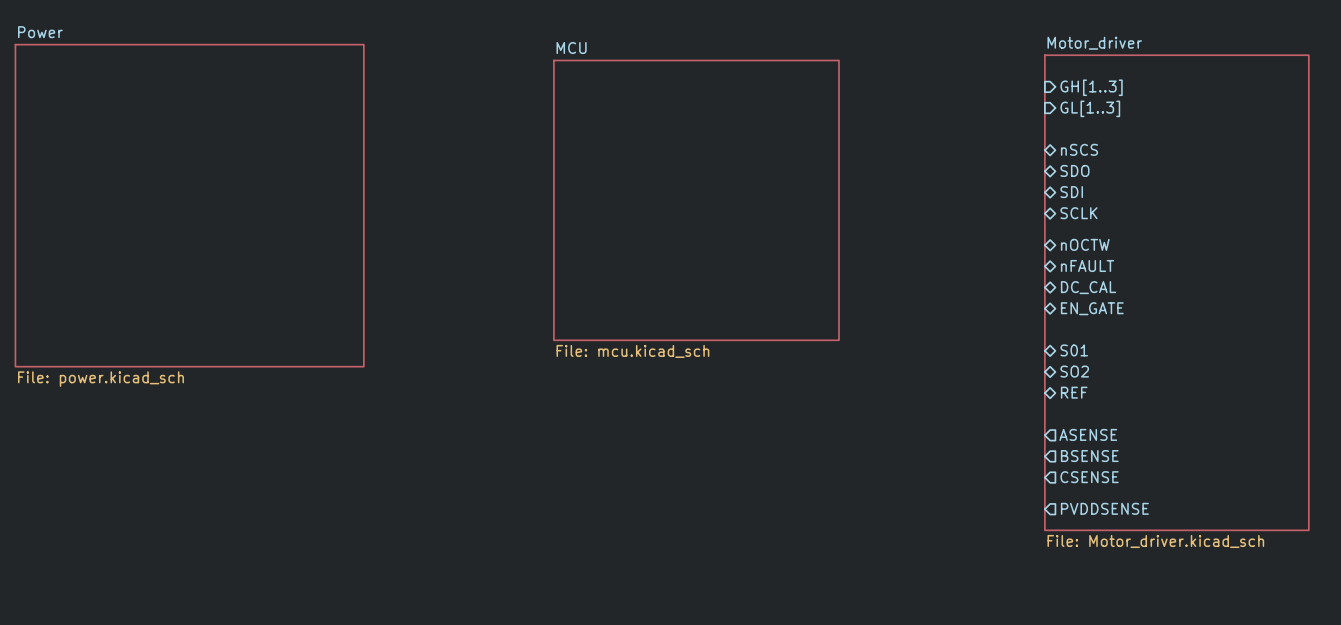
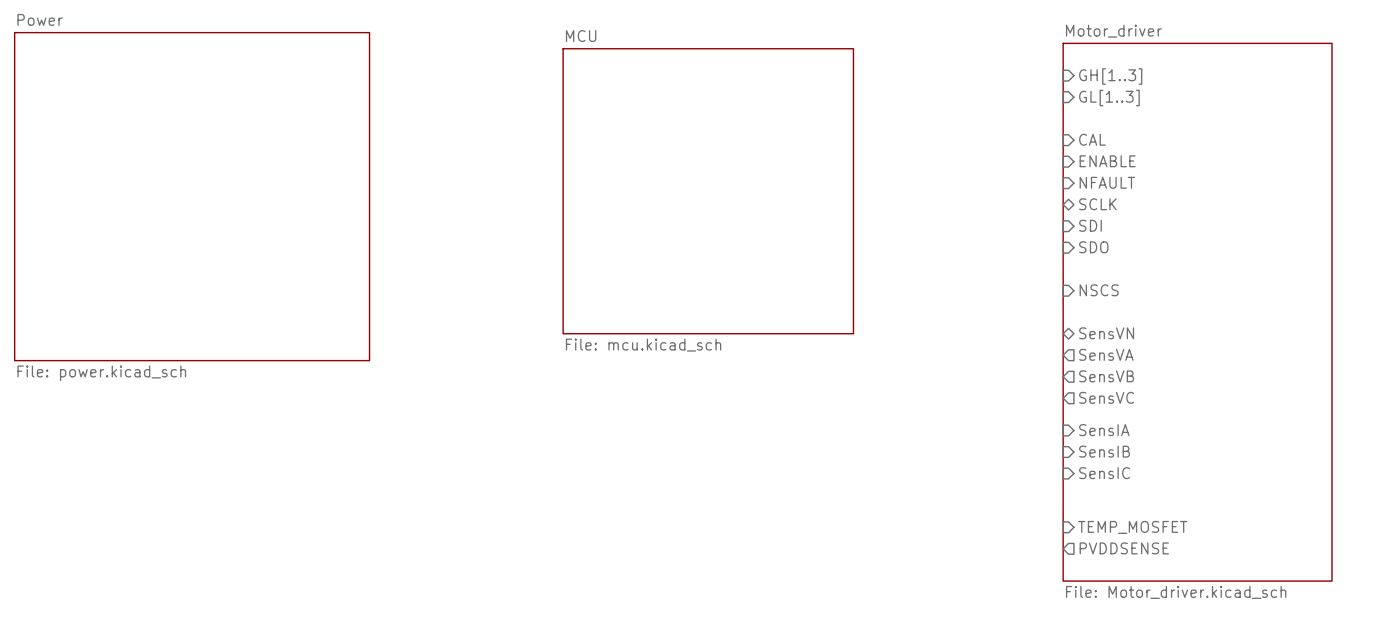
sheet pin shape: bidirectional (1079, 149) -> input (1092, 139)
sheet pin: nSCS (1079, 149) -> CAL (1092, 139)
sheet pin shape: bidirectional (1074, 170) -> input (1107, 161)
sheet pin: SDO (1074, 170) -> ENABLE (1107, 161)
sheet pin shape: bidirectional (1071, 192) -> input (1107, 182)
sheet pin: SDI (1071, 192) -> NFAULT (1107, 182)
sheet pin: none -> SDI (1090, 225)
sheet pin: nOCTW (1085, 244) -> none
sheet pin: none -> SDO (1093, 247)
sheet pin: nFAULT (1087, 265) -> none
sheet pin: DC_CAL (1088, 287) -> none
sheet Motor_driver: File: Motor_driver.kicad_sch (1176, 292) -> none
sheet pin: none -> NSCS (1099, 290)
sheet pin: EN_GATE (1092, 308) -> none
sheet Motor_driver: none -> File: Motor_driver.kicad_sch (1197, 312)
sheet pin: none -> SensVN (1106, 333)
sheet pin: S01 (1074, 350) -> none
sheet pin: none -> SensVA (1106, 354)
sheet pin: SO2 (1074, 371) -> none
sheet pin: none -> SensVB (1106, 376)
sheet pin: REF (1074, 392) -> none
sheet pin: none -> SensVC (1106, 397)
sheet pin shape: output (1088, 434) -> input (1104, 430)
sheet pin: ASENSE (1088, 434) -> SensIA (1104, 430)
sheet pin shape: output (1089, 456) -> input (1104, 451)
sheet pin: BSENSE (1089, 456) -> SensIB (1104, 451)
sheet pin shape: output (1089, 477) -> input (1104, 473)
sheet pin: CSENSE (1089, 477) -> SensIC (1104, 473)
sheet pin position: PVDDSENSE (1104, 508) -> PVDDSENSE (1124, 548)
sheet pin: none -> TEMP_MOSFET (1132, 527)

